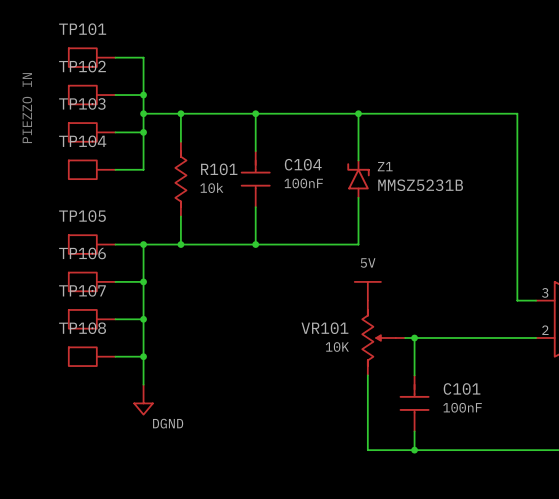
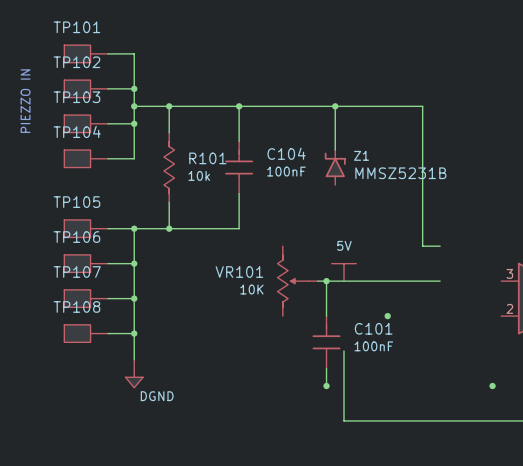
wire: (451, 113) (517, 113) (517, 300) (536, 300) -> (422, 106) (422, 246) (440, 246)
wire: (358, 197) (358, 244) (255, 244) -> none
junction: (255, 244) -> none
junction: none -> (326, 281)
VR101 position: (383, 338) -> (297, 281)
wire: (405, 338) (536, 338) -> (317, 281) (440, 281)
wire: (414, 338) (414, 375) -> (326, 281) (326, 316)
C101 position: (414, 403) -> (326, 342)
junction: none -> (326, 386)
junction: none -> (492, 386)
wire: (414, 431) (414, 450) -> (326, 368) (326, 386)
junction: (414, 450) -> none

